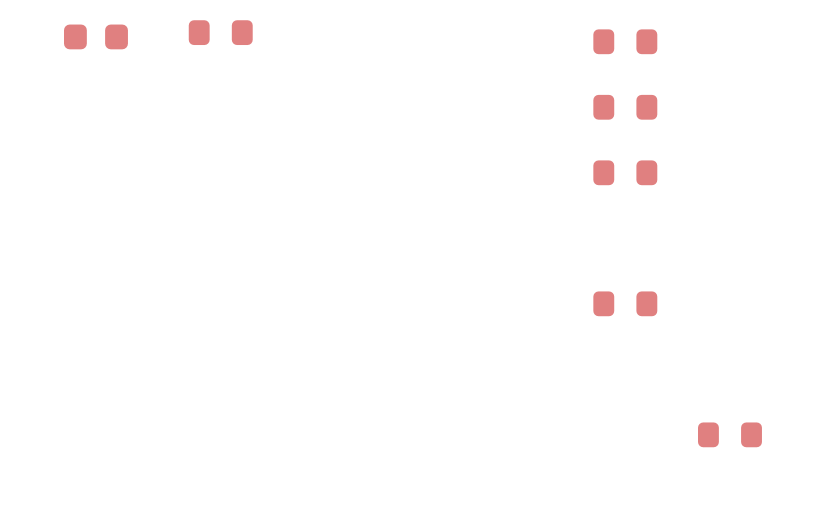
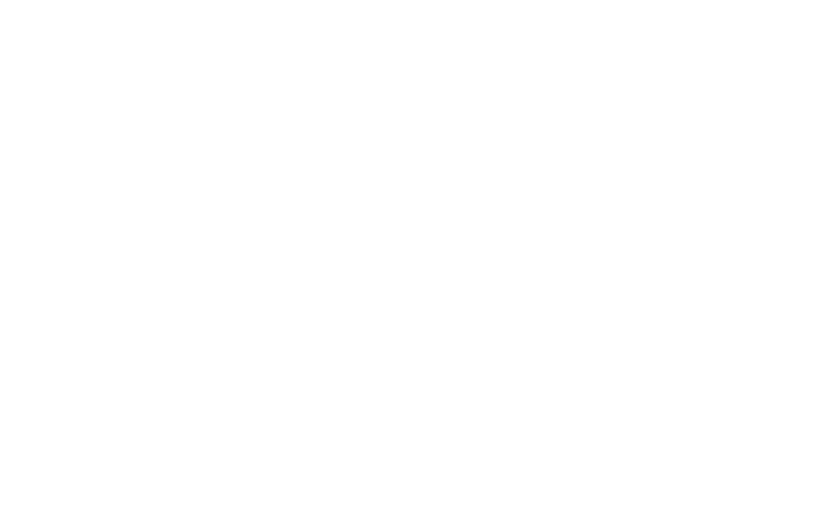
part: (220, 32) -> none
part: (95, 36) -> none
part: (625, 41) -> none
part: (625, 107) -> none
part: (625, 172) -> none
part: (625, 303) -> none
part: (729, 434) -> none

